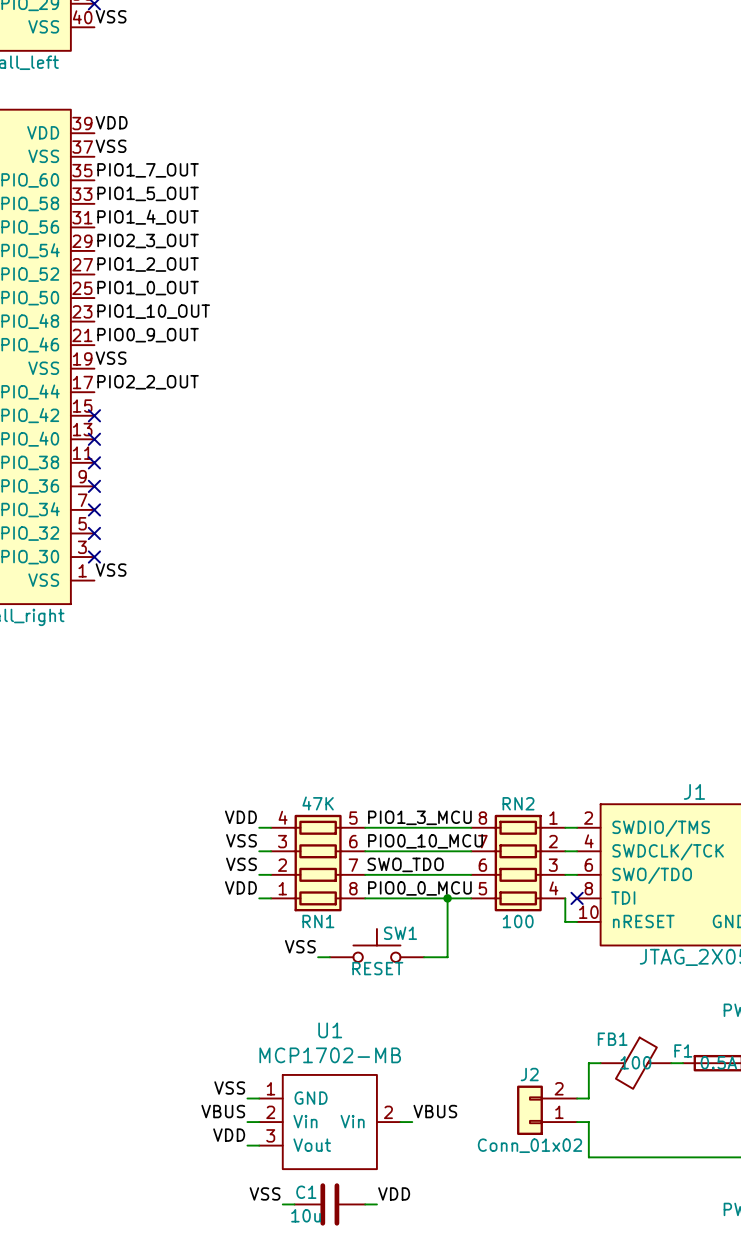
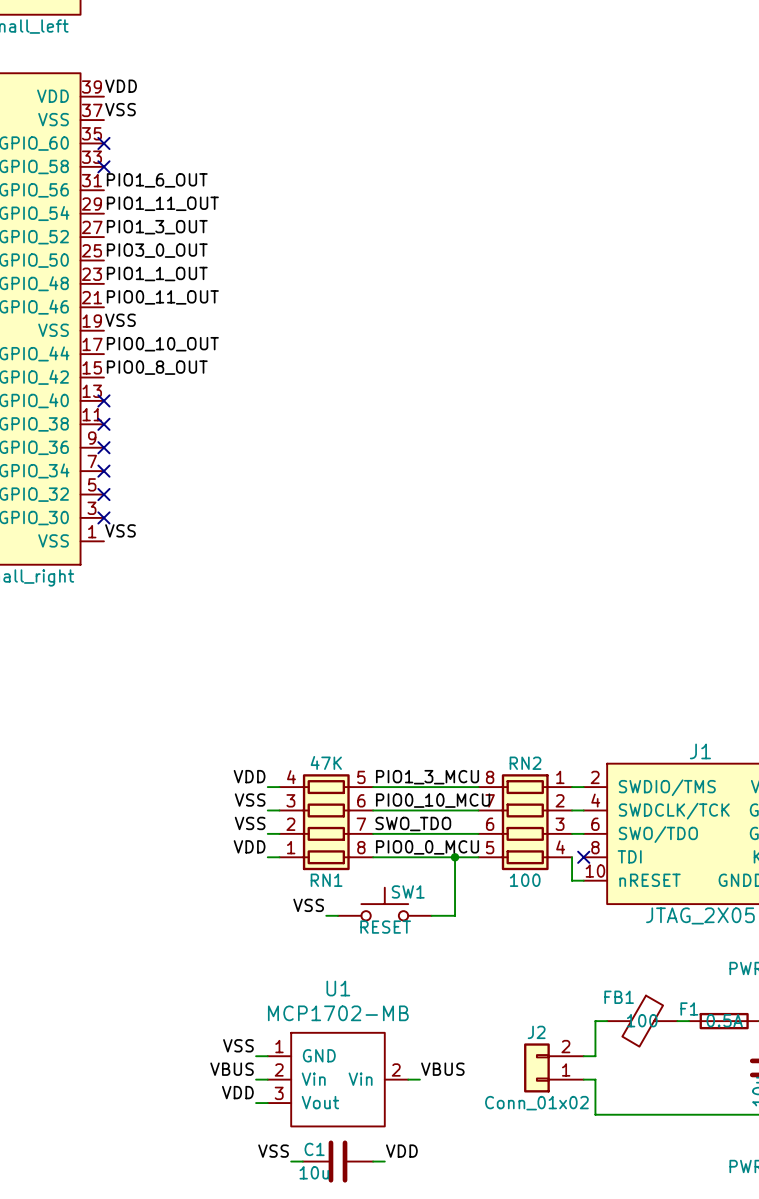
label: PIO1_7_OUT (148, 170) -> none
no-connect mark: none -> (103, 143)
label: PIO1_5_OUT (148, 193) -> none
no-connect mark: none -> (103, 166)
label: PIO1_4_OUT (148, 217) -> PIO1_6_OUT (157, 180)
label: PIO2_3_OUT (148, 241) -> PIO1_11_OUT (162, 203)
label: PIO1_2_OUT (148, 264) -> PIO1_3_OUT (157, 227)
label: PIO1_0_OUT (148, 288) -> PIO3_0_OUT (157, 250)
label: PIO1_10_OUT (153, 311) -> PIO1_1_OUT (157, 274)
label: PIO0_9_OUT (148, 335) -> PIO0_11_OUT (162, 297)
label: PIO2_2_OUT (148, 382) -> PIO0_10_OUT (162, 344)
label: none -> PIO0_8_OUT (157, 367)
no-connect mark: (94, 415) -> none

